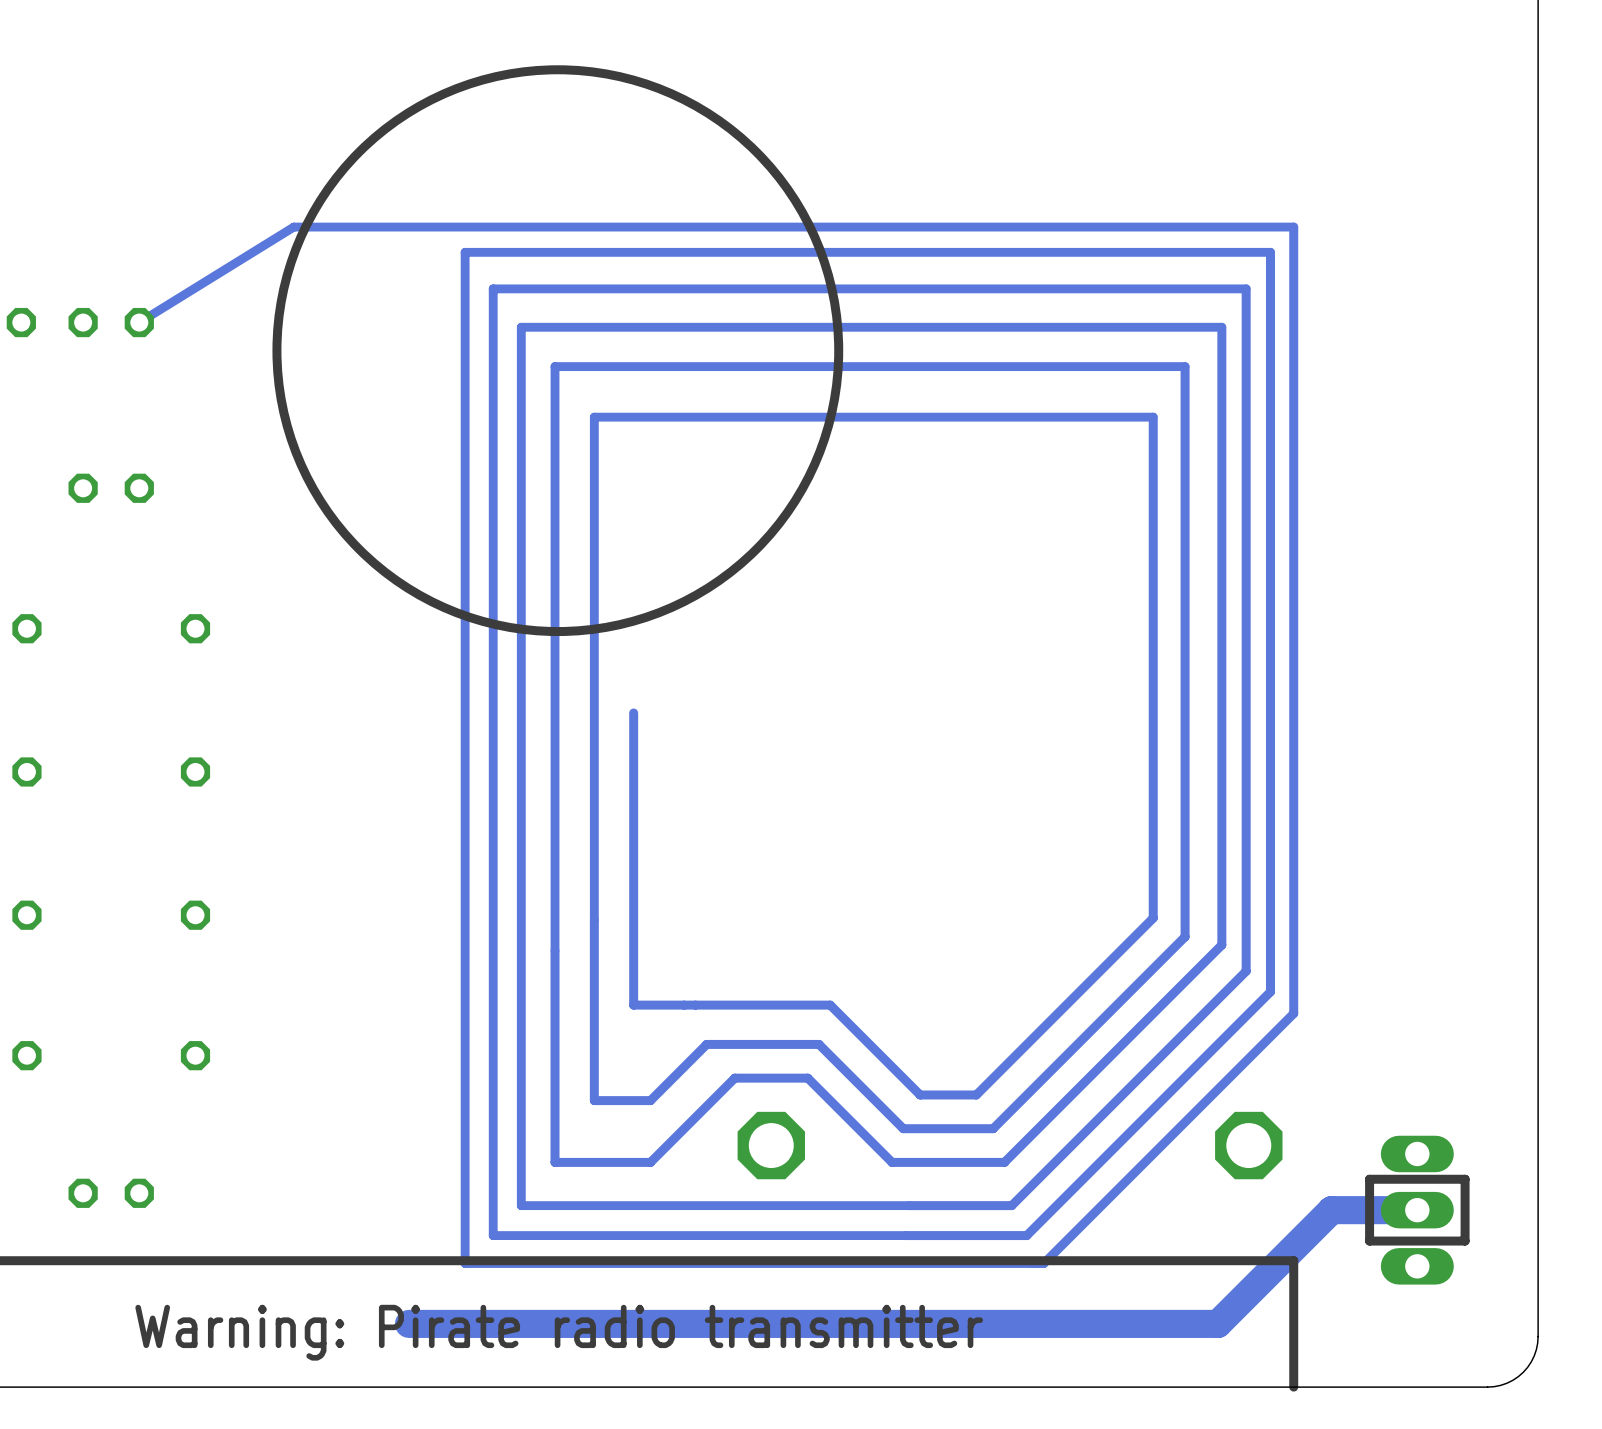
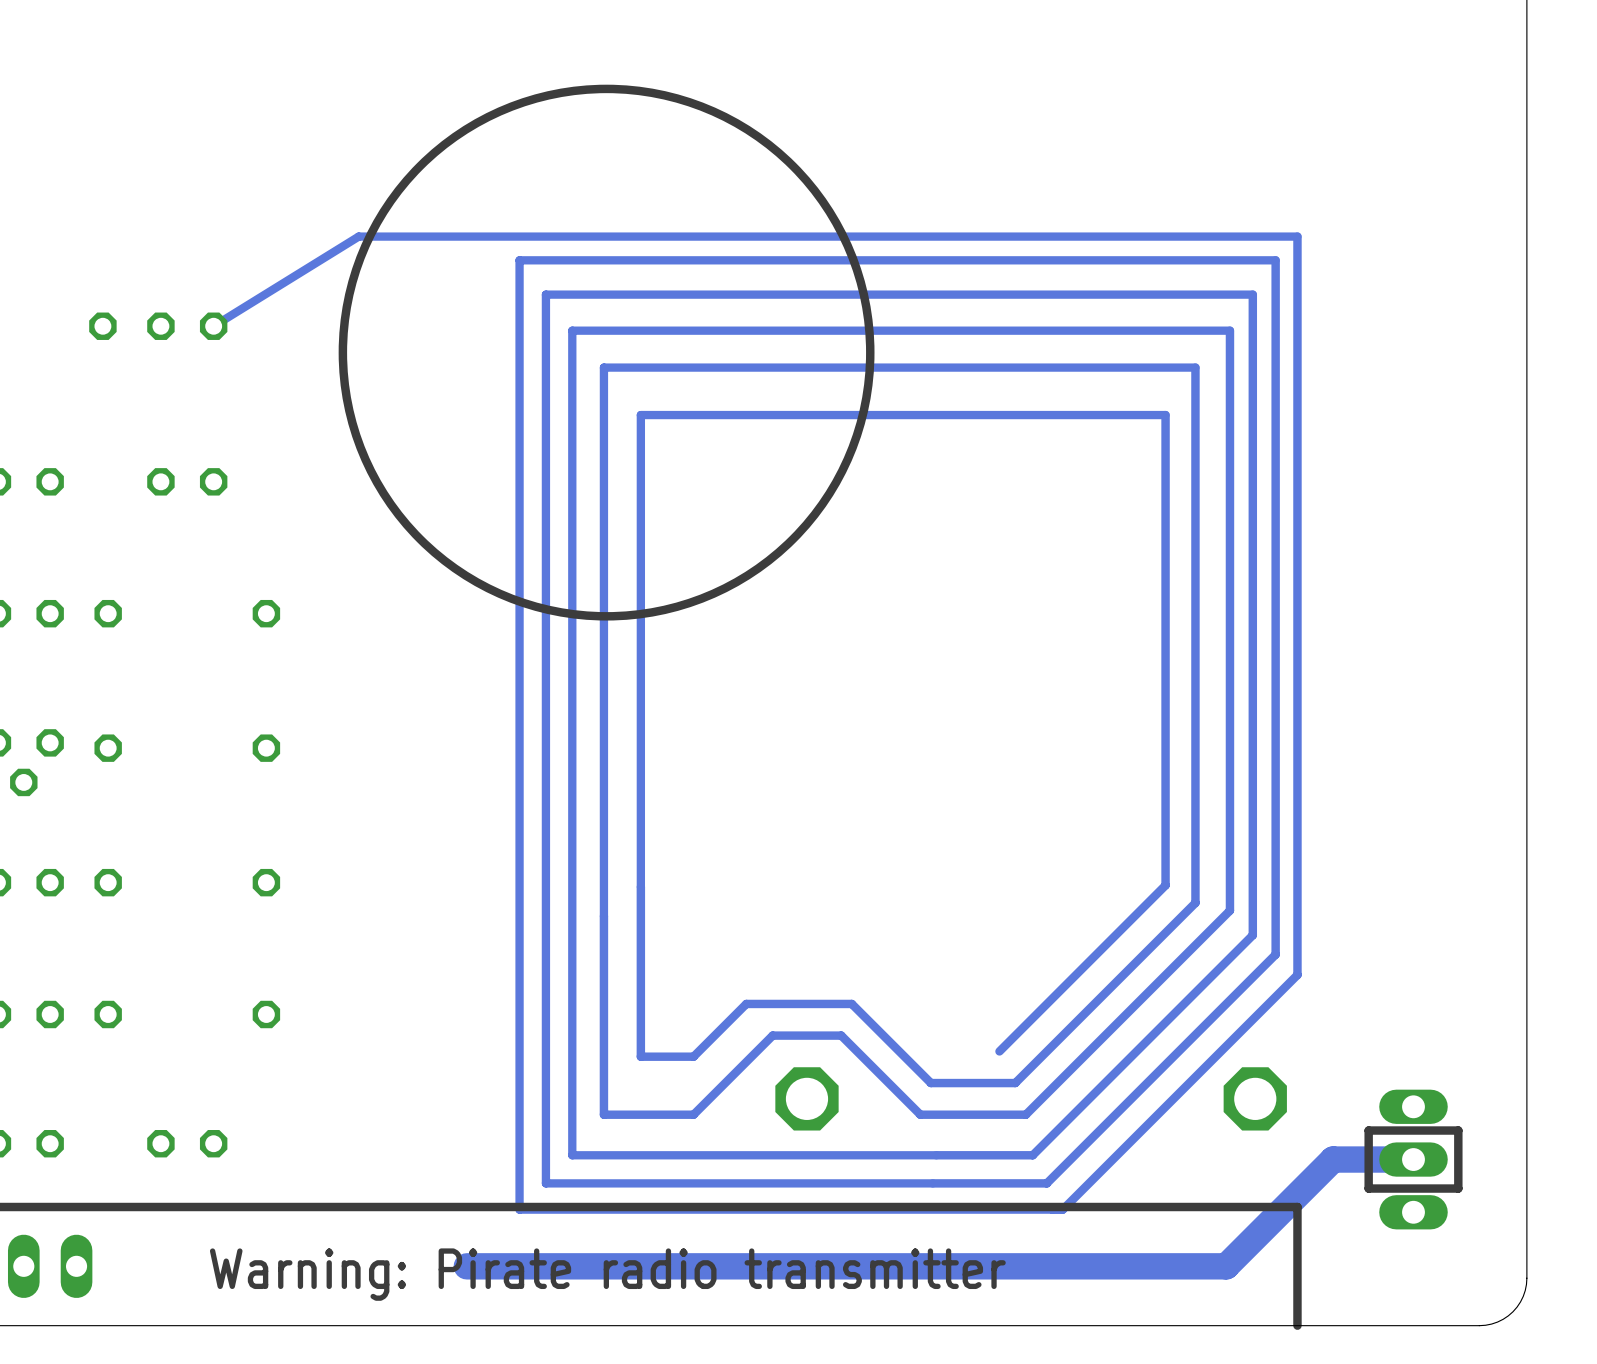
track: (633, 712) (633, 1005) (830, 1005) (920, 1094) (976, 1094) -> none

